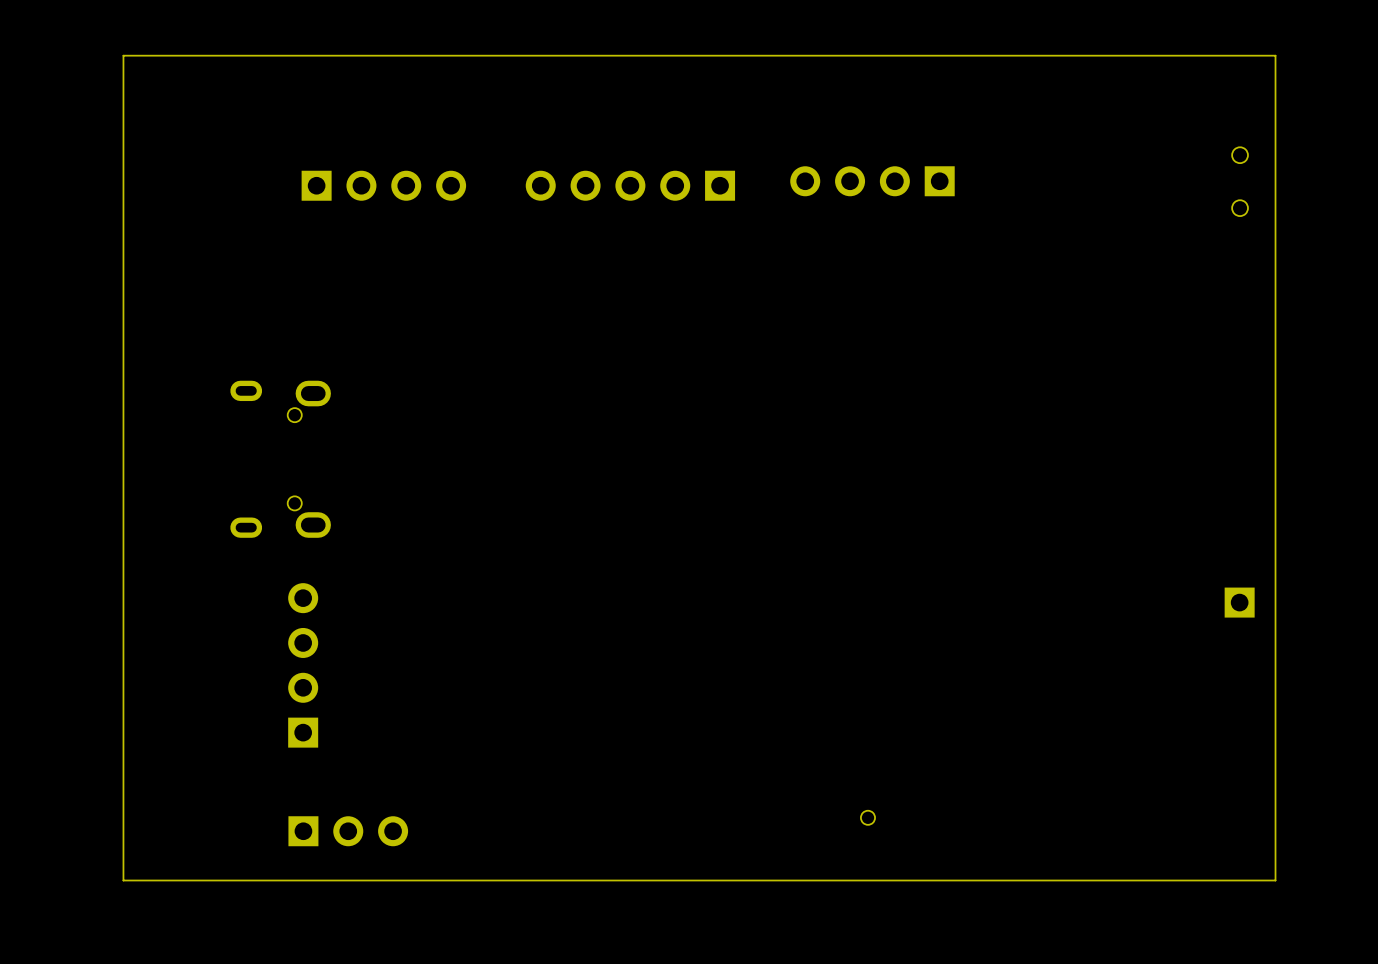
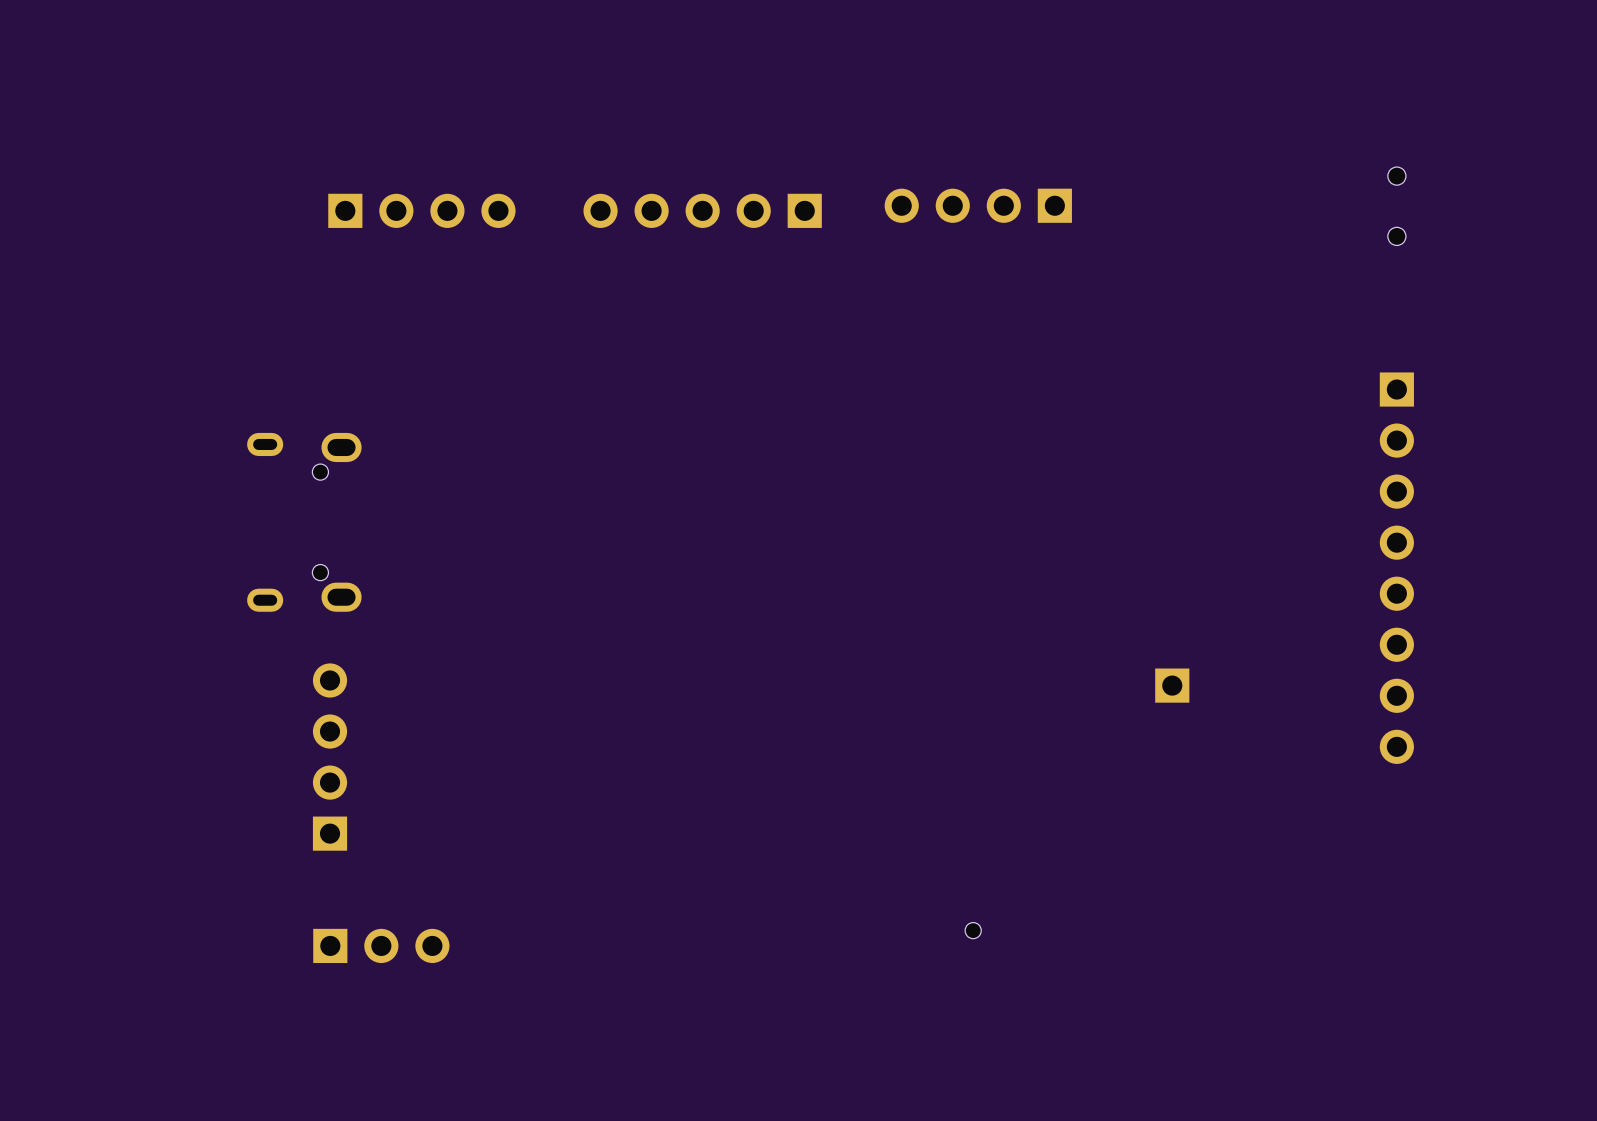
board edge: (1275, 55) (123, 55) (123, 880) (1275, 880) (1275, 55) -> none
part: none -> (1396, 568)
part position: (1239, 602) -> (1172, 685)

